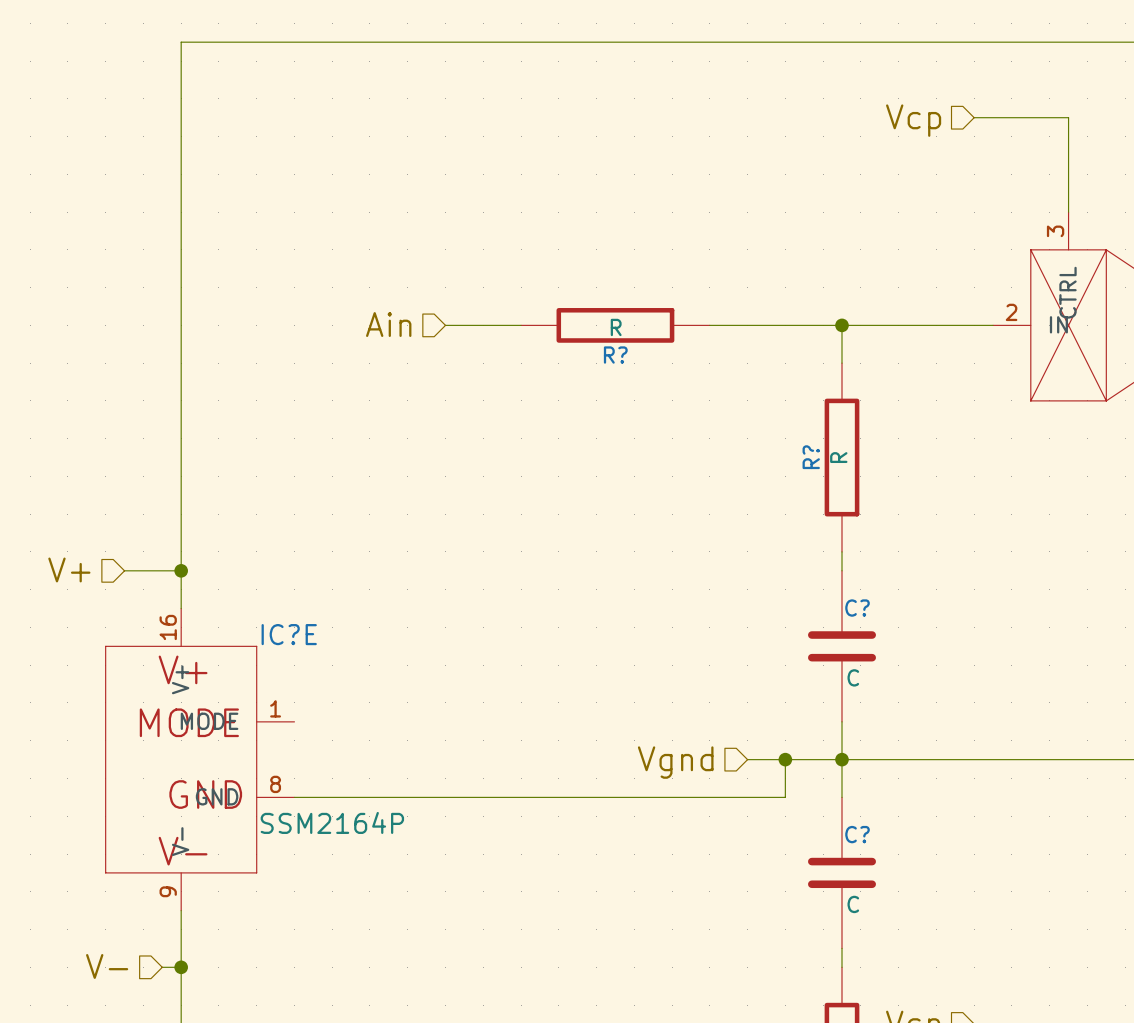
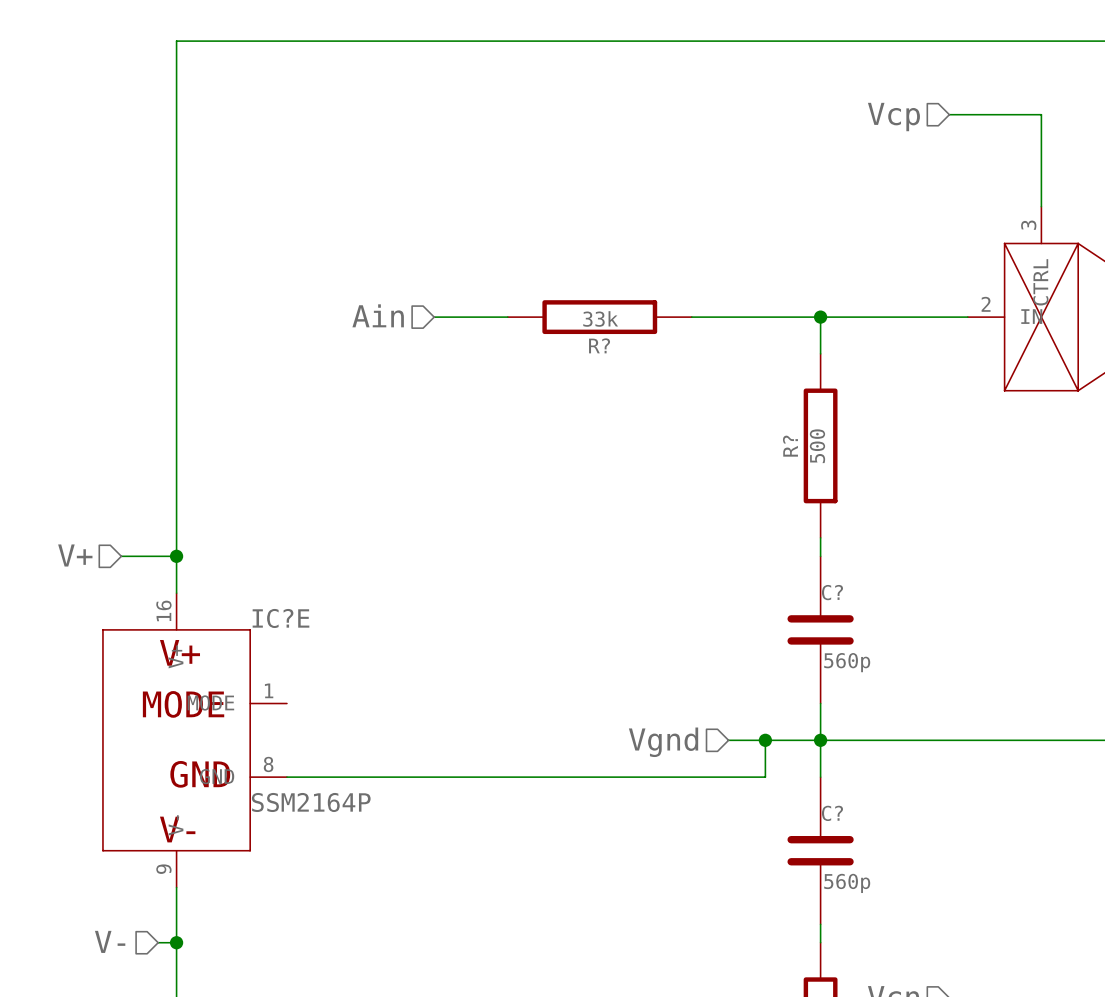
R? value: R (616, 327) -> 33k (600, 318)
R? value: R (838, 457) -> 500 (817, 446)
C? value: C (853, 677) -> 560p (847, 662)
C? value: C (853, 904) -> 560p (847, 883)

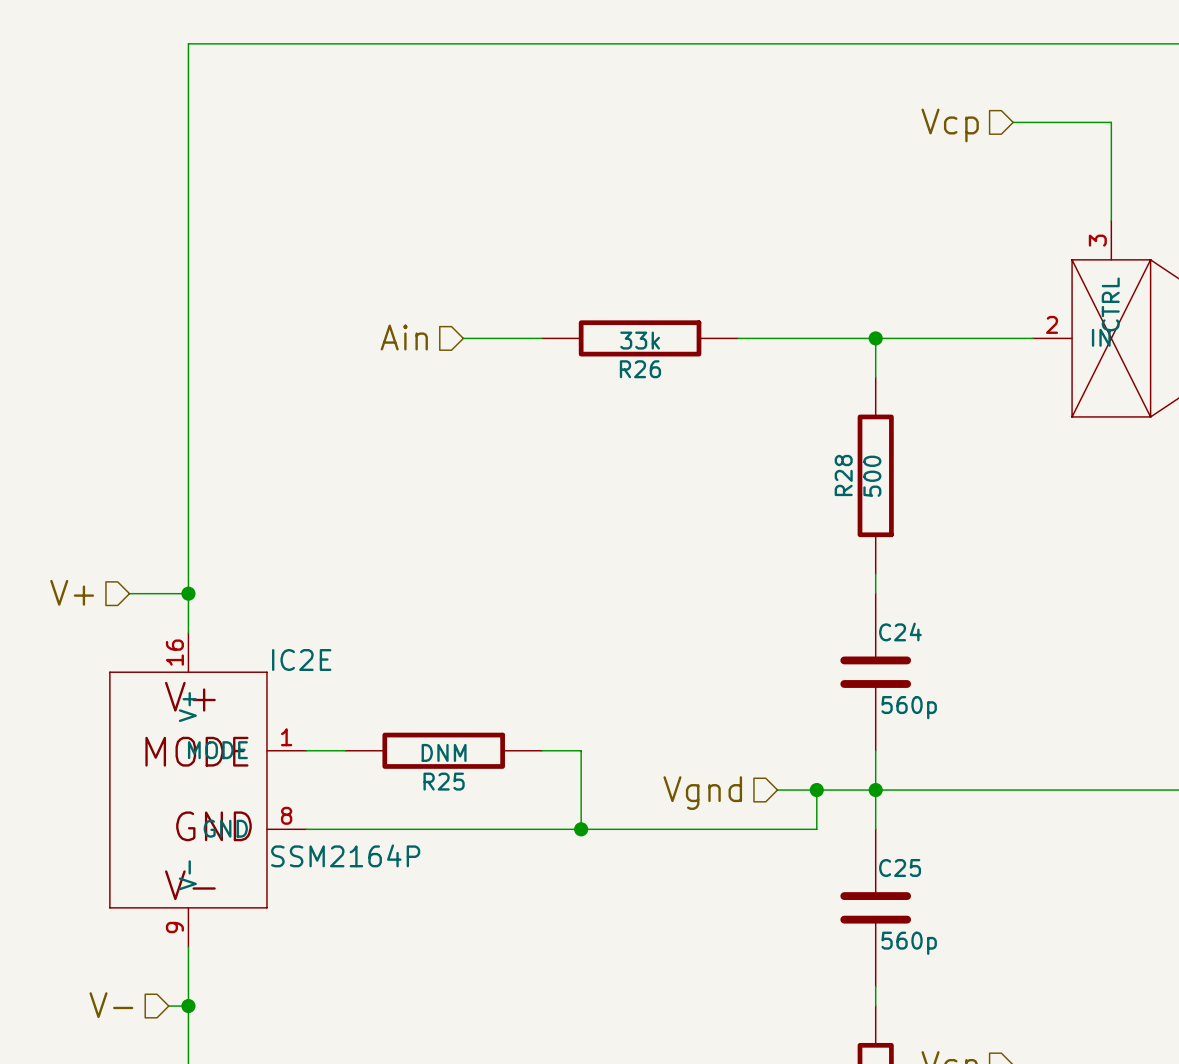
R? name: R? (599, 345) -> R26 (640, 369)
R? name: R? (790, 446) -> R28 (843, 475)
C? name: C? (832, 592) -> C24 (900, 631)
IC?E name: IC?E (280, 618) -> IC2E (301, 660)
wire: none -> (306, 750) (345, 750)
R25: none -> DNM (443, 750)
wire: none -> (541, 750) (581, 750) (581, 829)
junction: none -> (581, 829)
C? name: C? (832, 813) -> C25 (900, 867)

